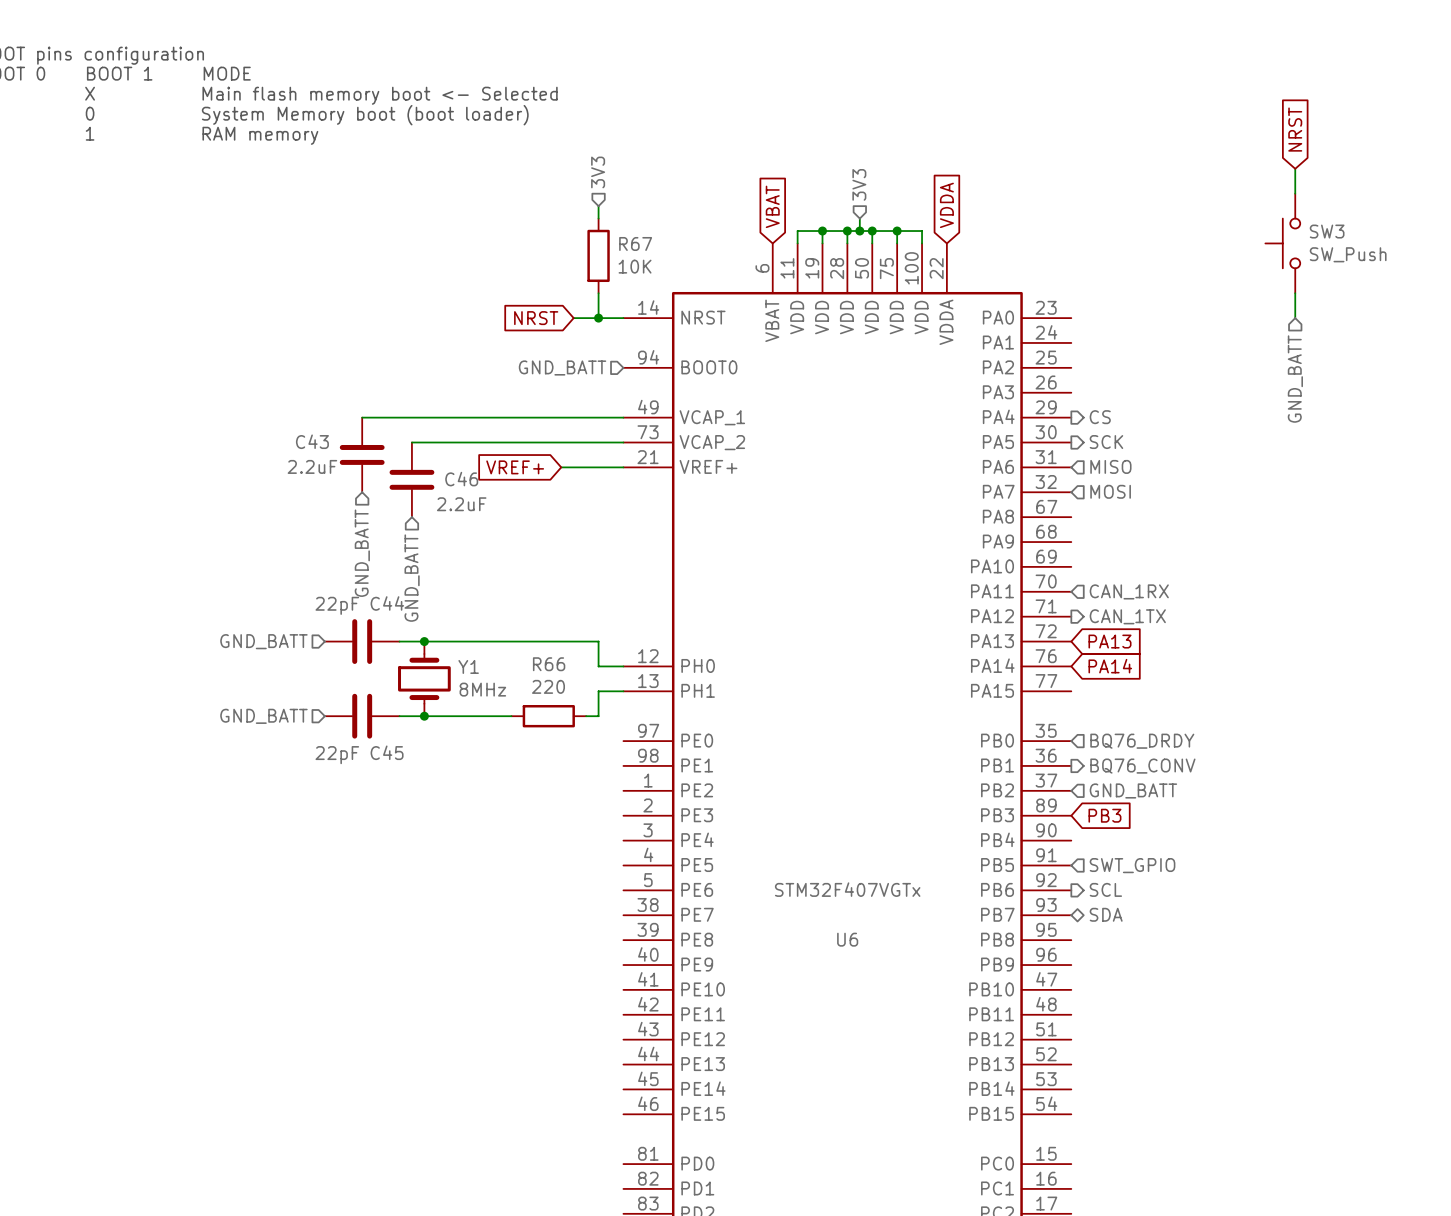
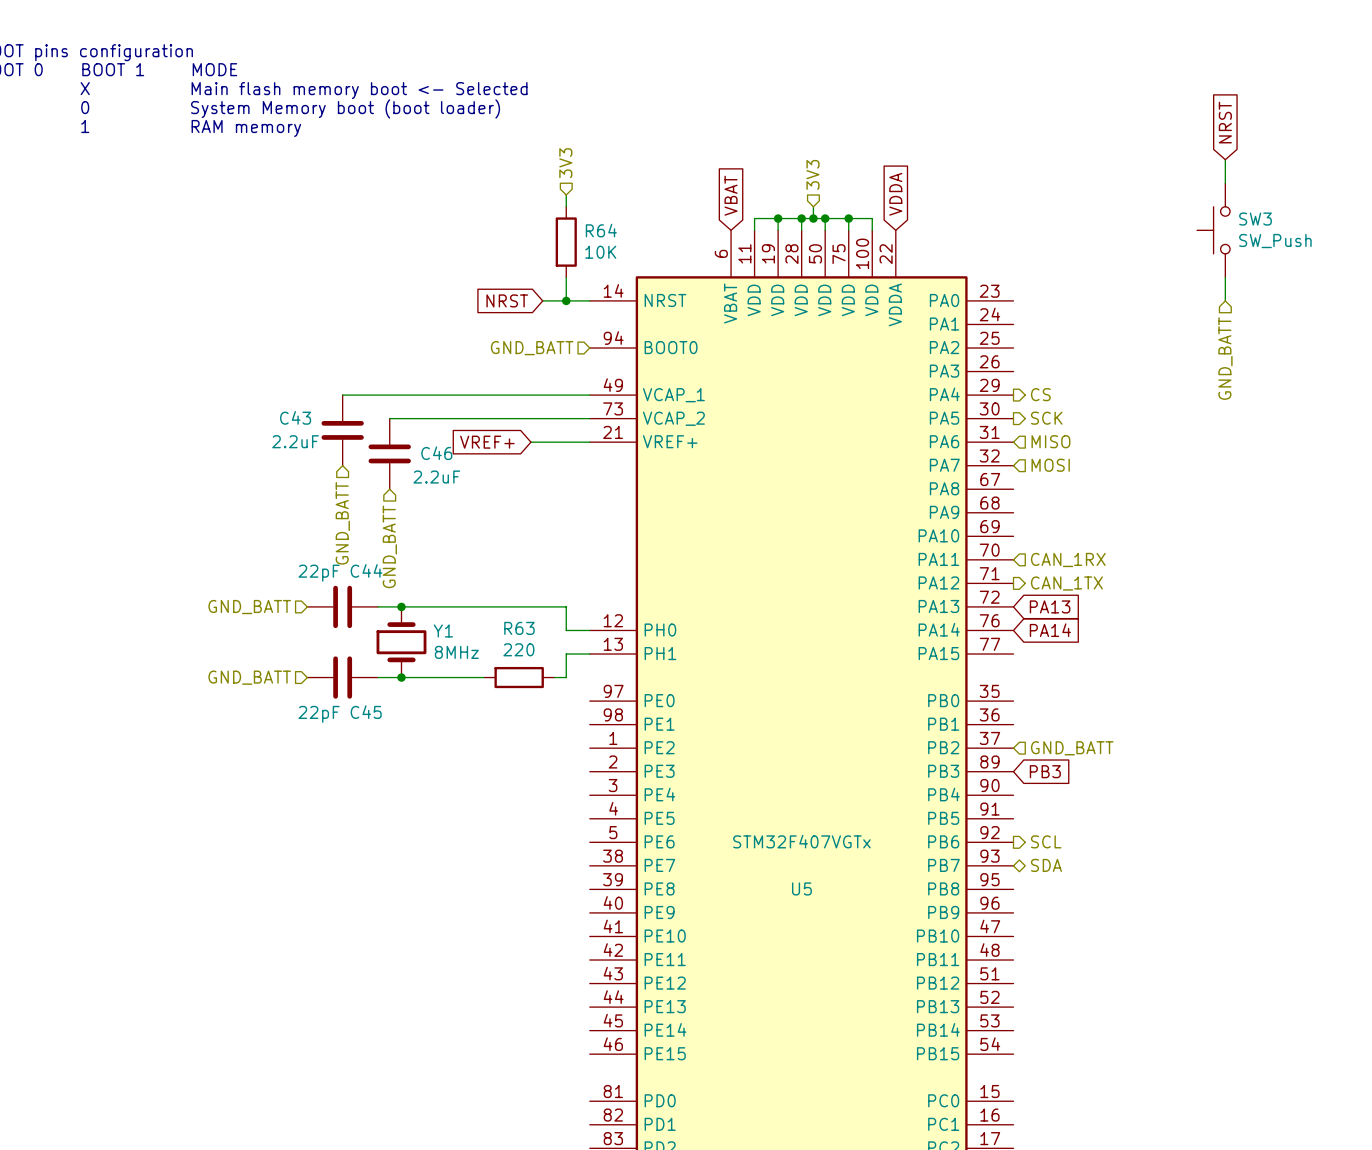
R67 name: R67 (635, 243) -> R64 (601, 230)
R66 name: R66 (549, 664) -> R63 (519, 628)
hierarchical label: BQ76_DRDY (1142, 741) -> none
hierarchical label: BQ76_CONV (1142, 766) -> none
hierarchical label: SWT_GPIO (1132, 865) -> none
U6 name: U6 (847, 939) -> U5 (801, 888)

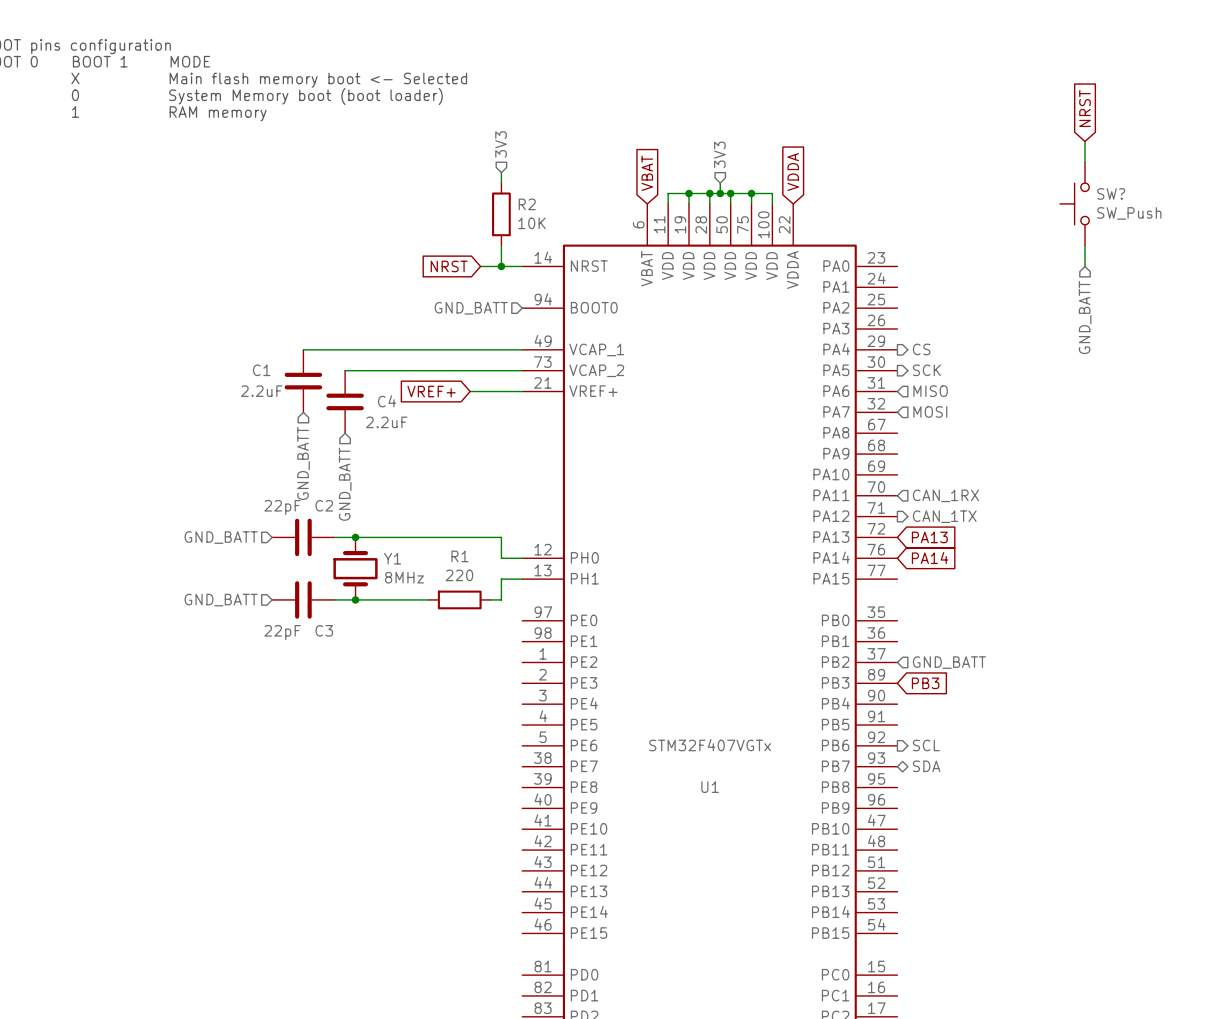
SW3 name: SW3 (1255, 219) -> SW? (1111, 193)
R64 name: R64 (601, 230) -> R2 (527, 204)
C43 name: C43 (295, 417) -> C1 (261, 370)
C46 name: C46 (436, 453) -> C4 (387, 401)
C44 name: C44 (366, 570) -> C2 (324, 505)
R63 name: R63 (519, 628) -> R1 (459, 556)
C45 name: C45 (366, 712) -> C3 (324, 630)
U5 name: U5 (801, 888) -> U1 (710, 787)

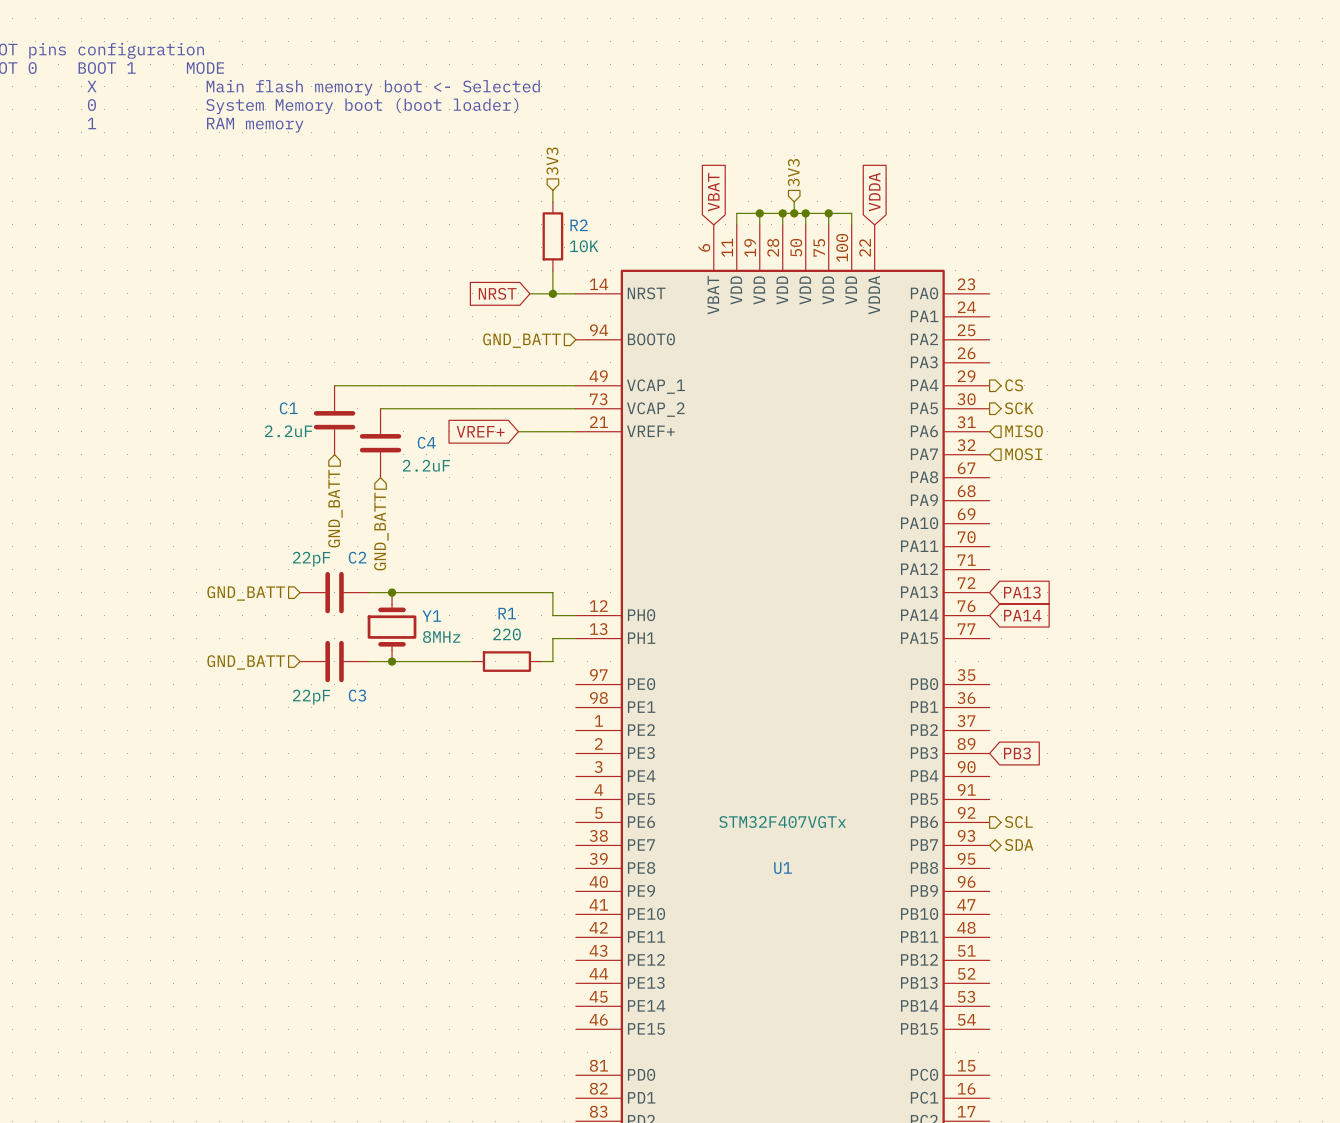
global label: NRST (1085, 108) -> none
wire: (1085, 141) (1085, 162) -> none
SW?: SW_Push (1074, 203) -> none
wire: (1085, 245) (1085, 266) -> none
hierarchical label: GND_BATT (1085, 317) -> none
hierarchical label: CAN_1RX (945, 495) -> none
hierarchical label: CAN_1TX (944, 516) -> none
hierarchical label: GND_BATT (949, 662) -> none

